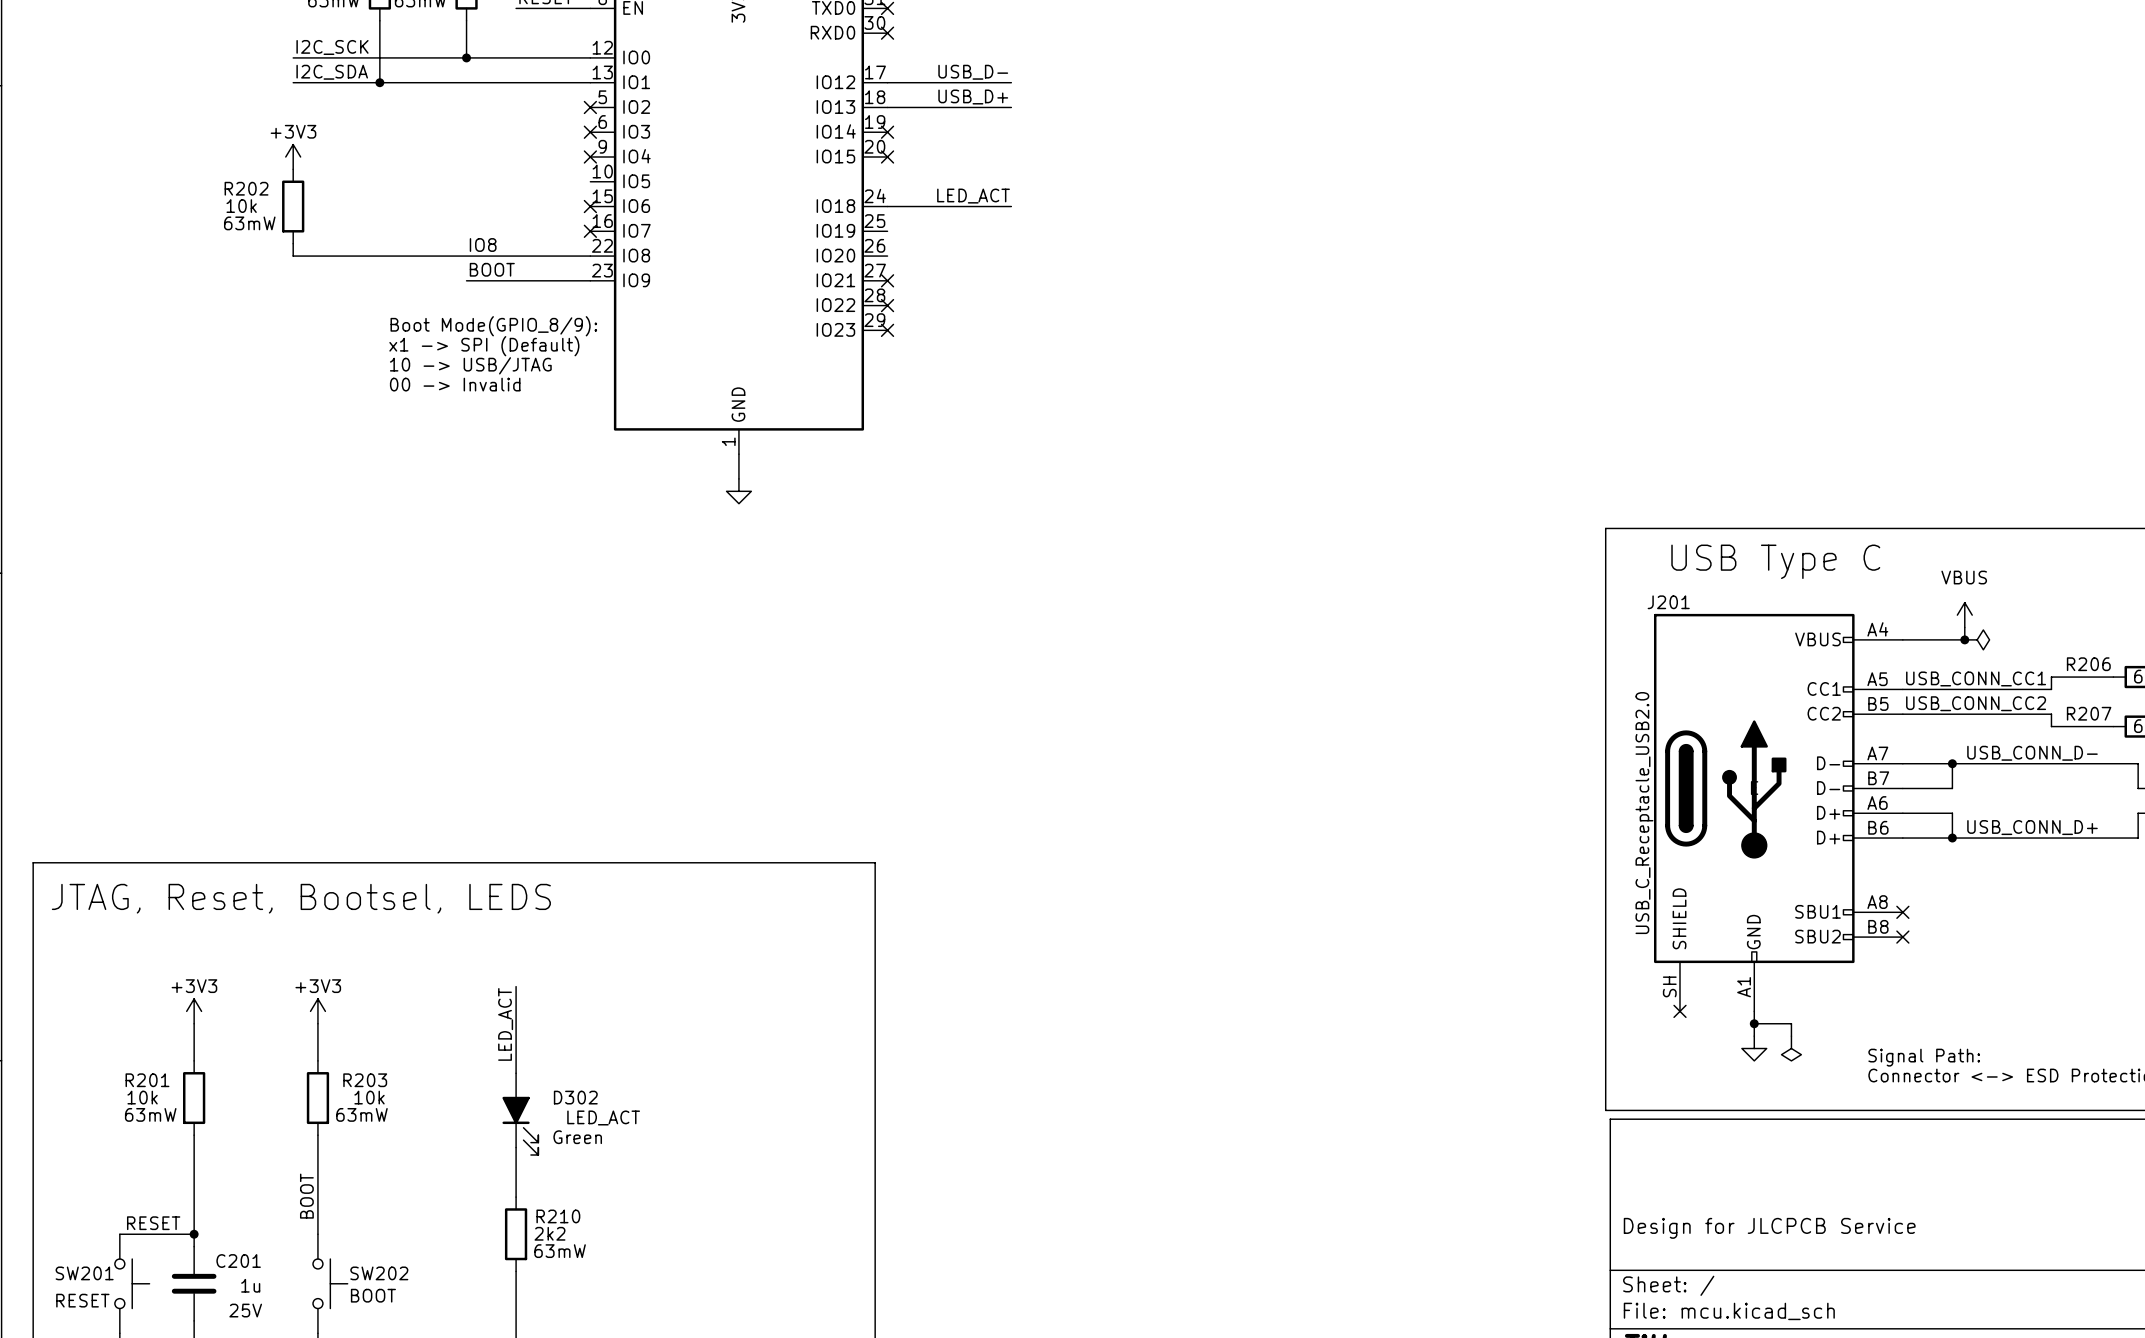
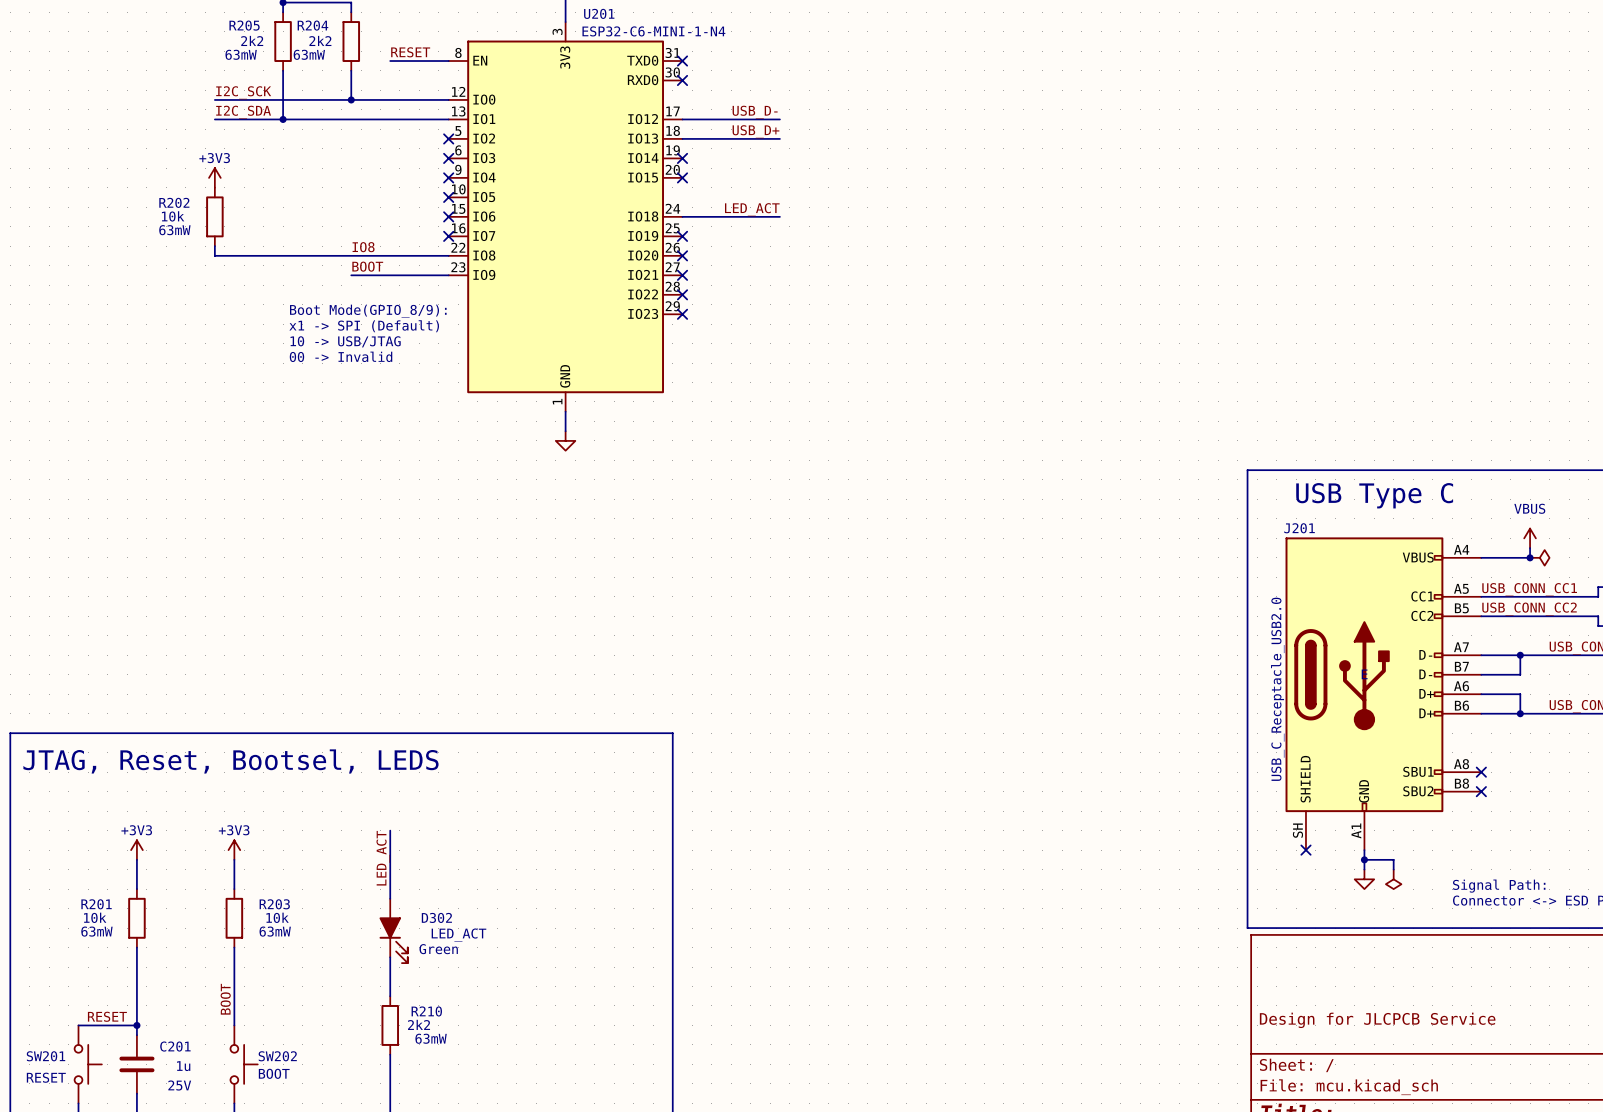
no-connect mark: none -> (448, 197)
no-connect mark: none -> (682, 236)
no-connect mark: none -> (682, 255)

